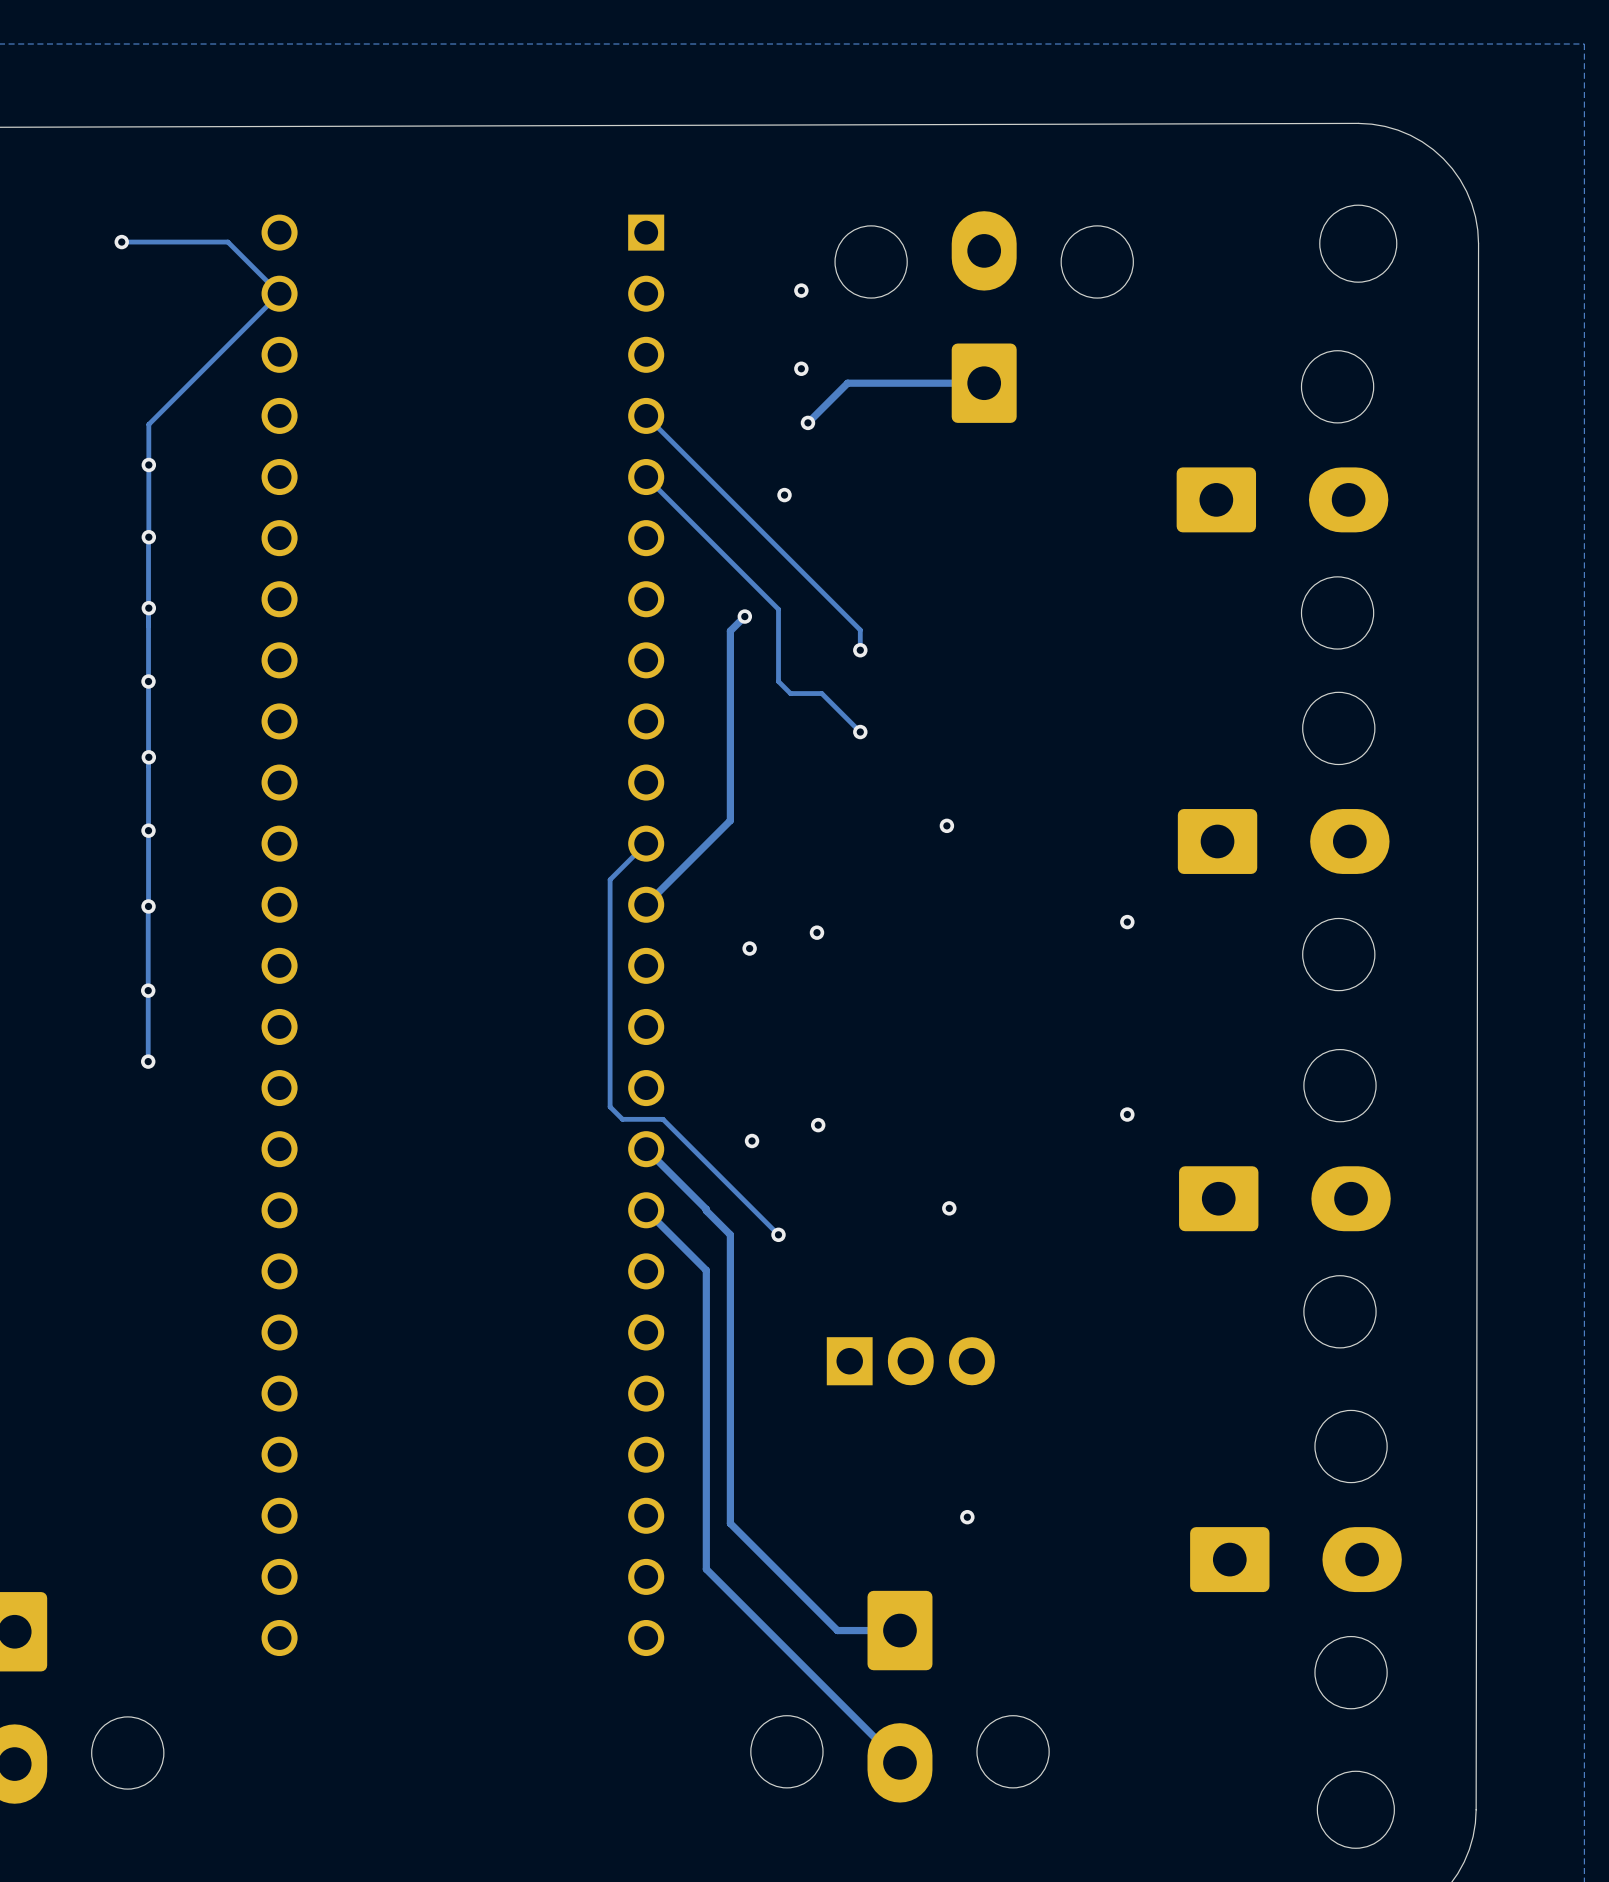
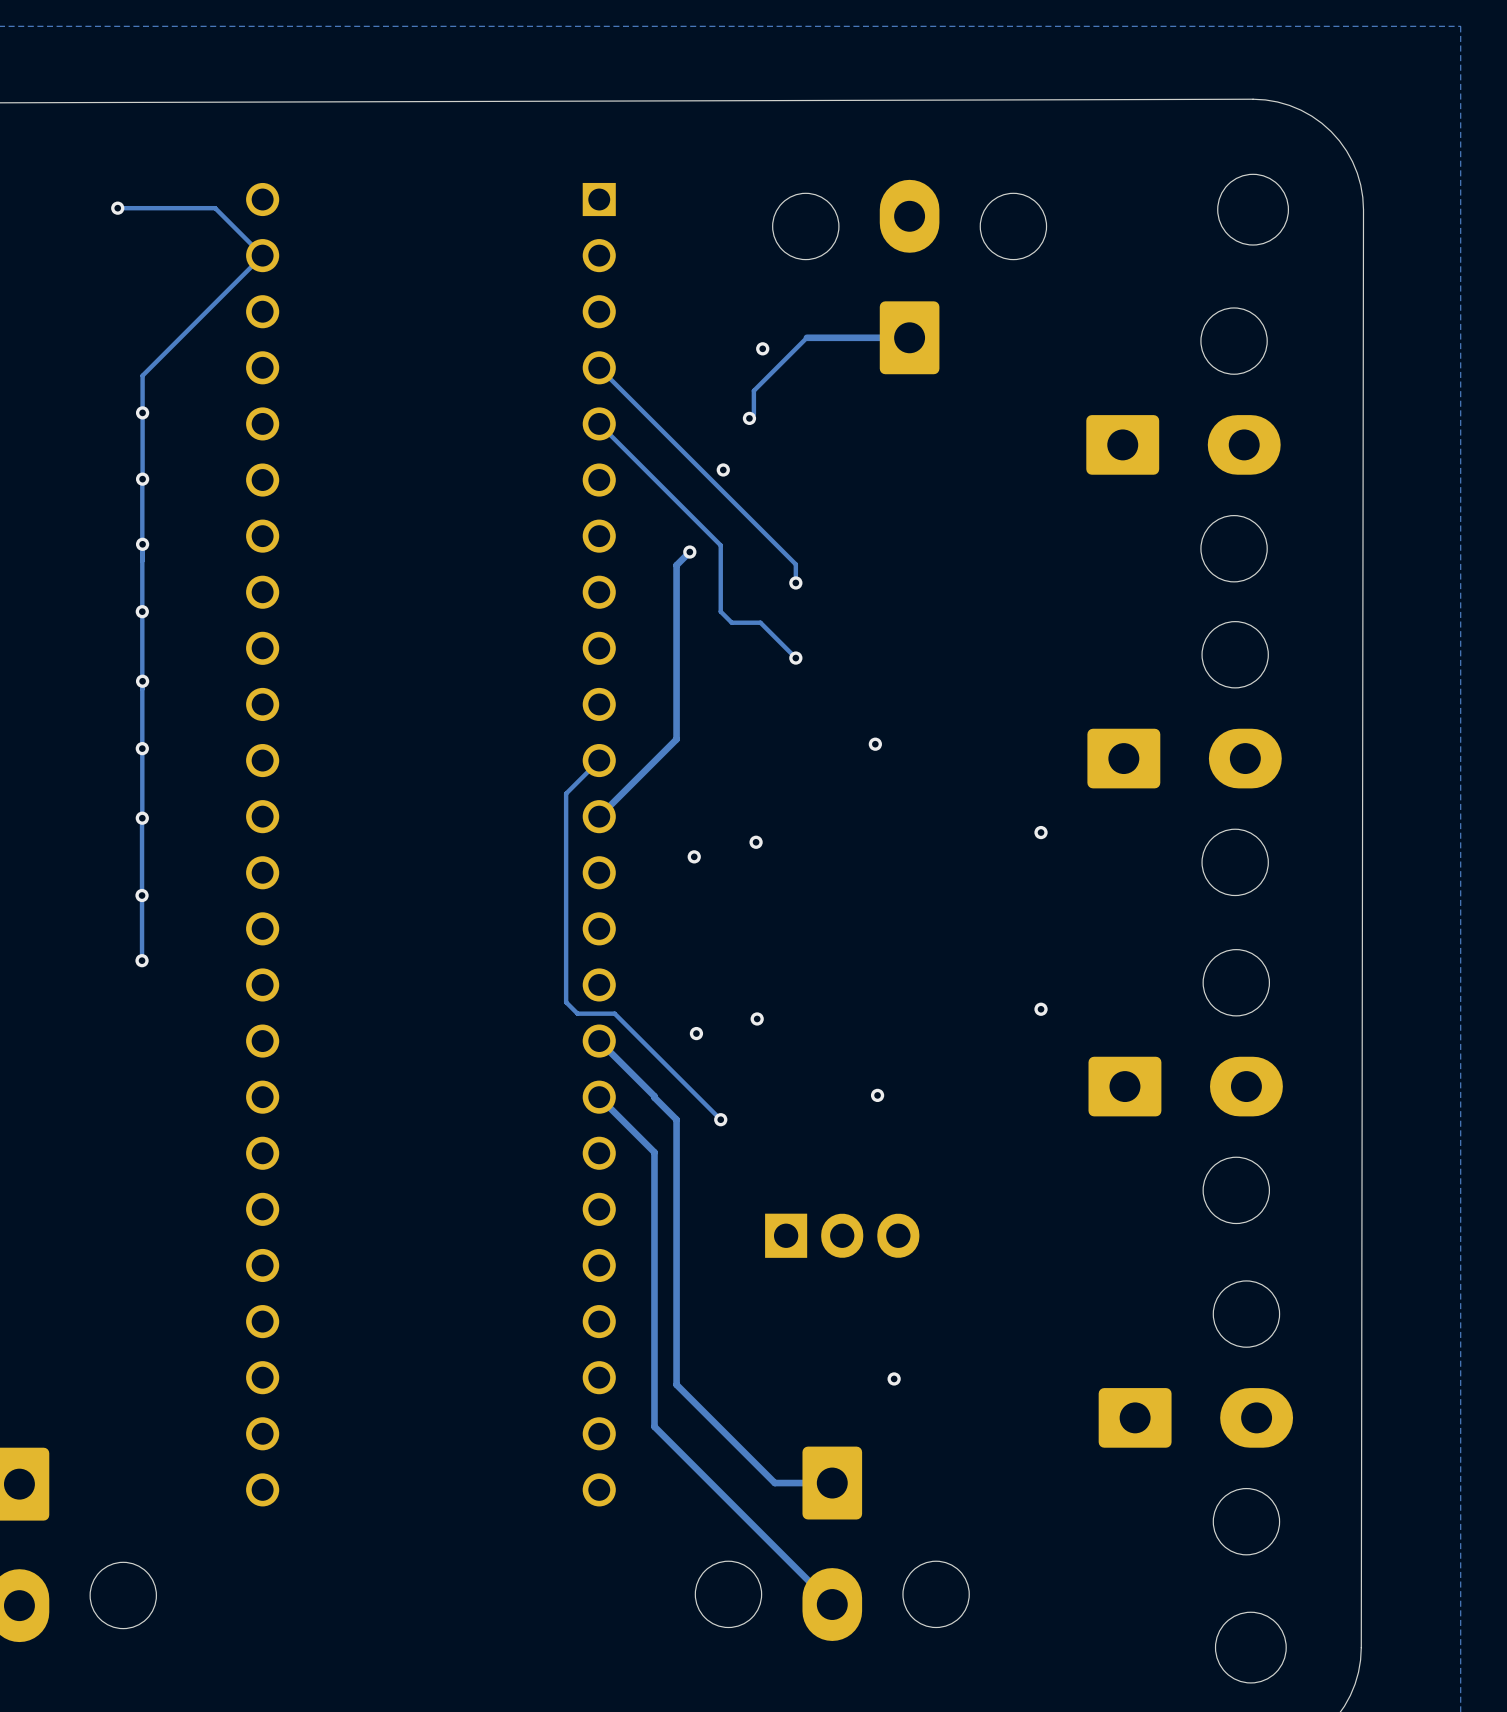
via: (801, 290) -> none
via: (801, 368) -> none
track: (872, 383) (847, 383) (807, 422) -> (806, 337) (753, 390) (753, 413) (749, 418)
via: none -> (762, 348)
via: (807, 422) -> none
via: none -> (749, 418)
via: (784, 495) -> none
via: none -> (723, 469)

